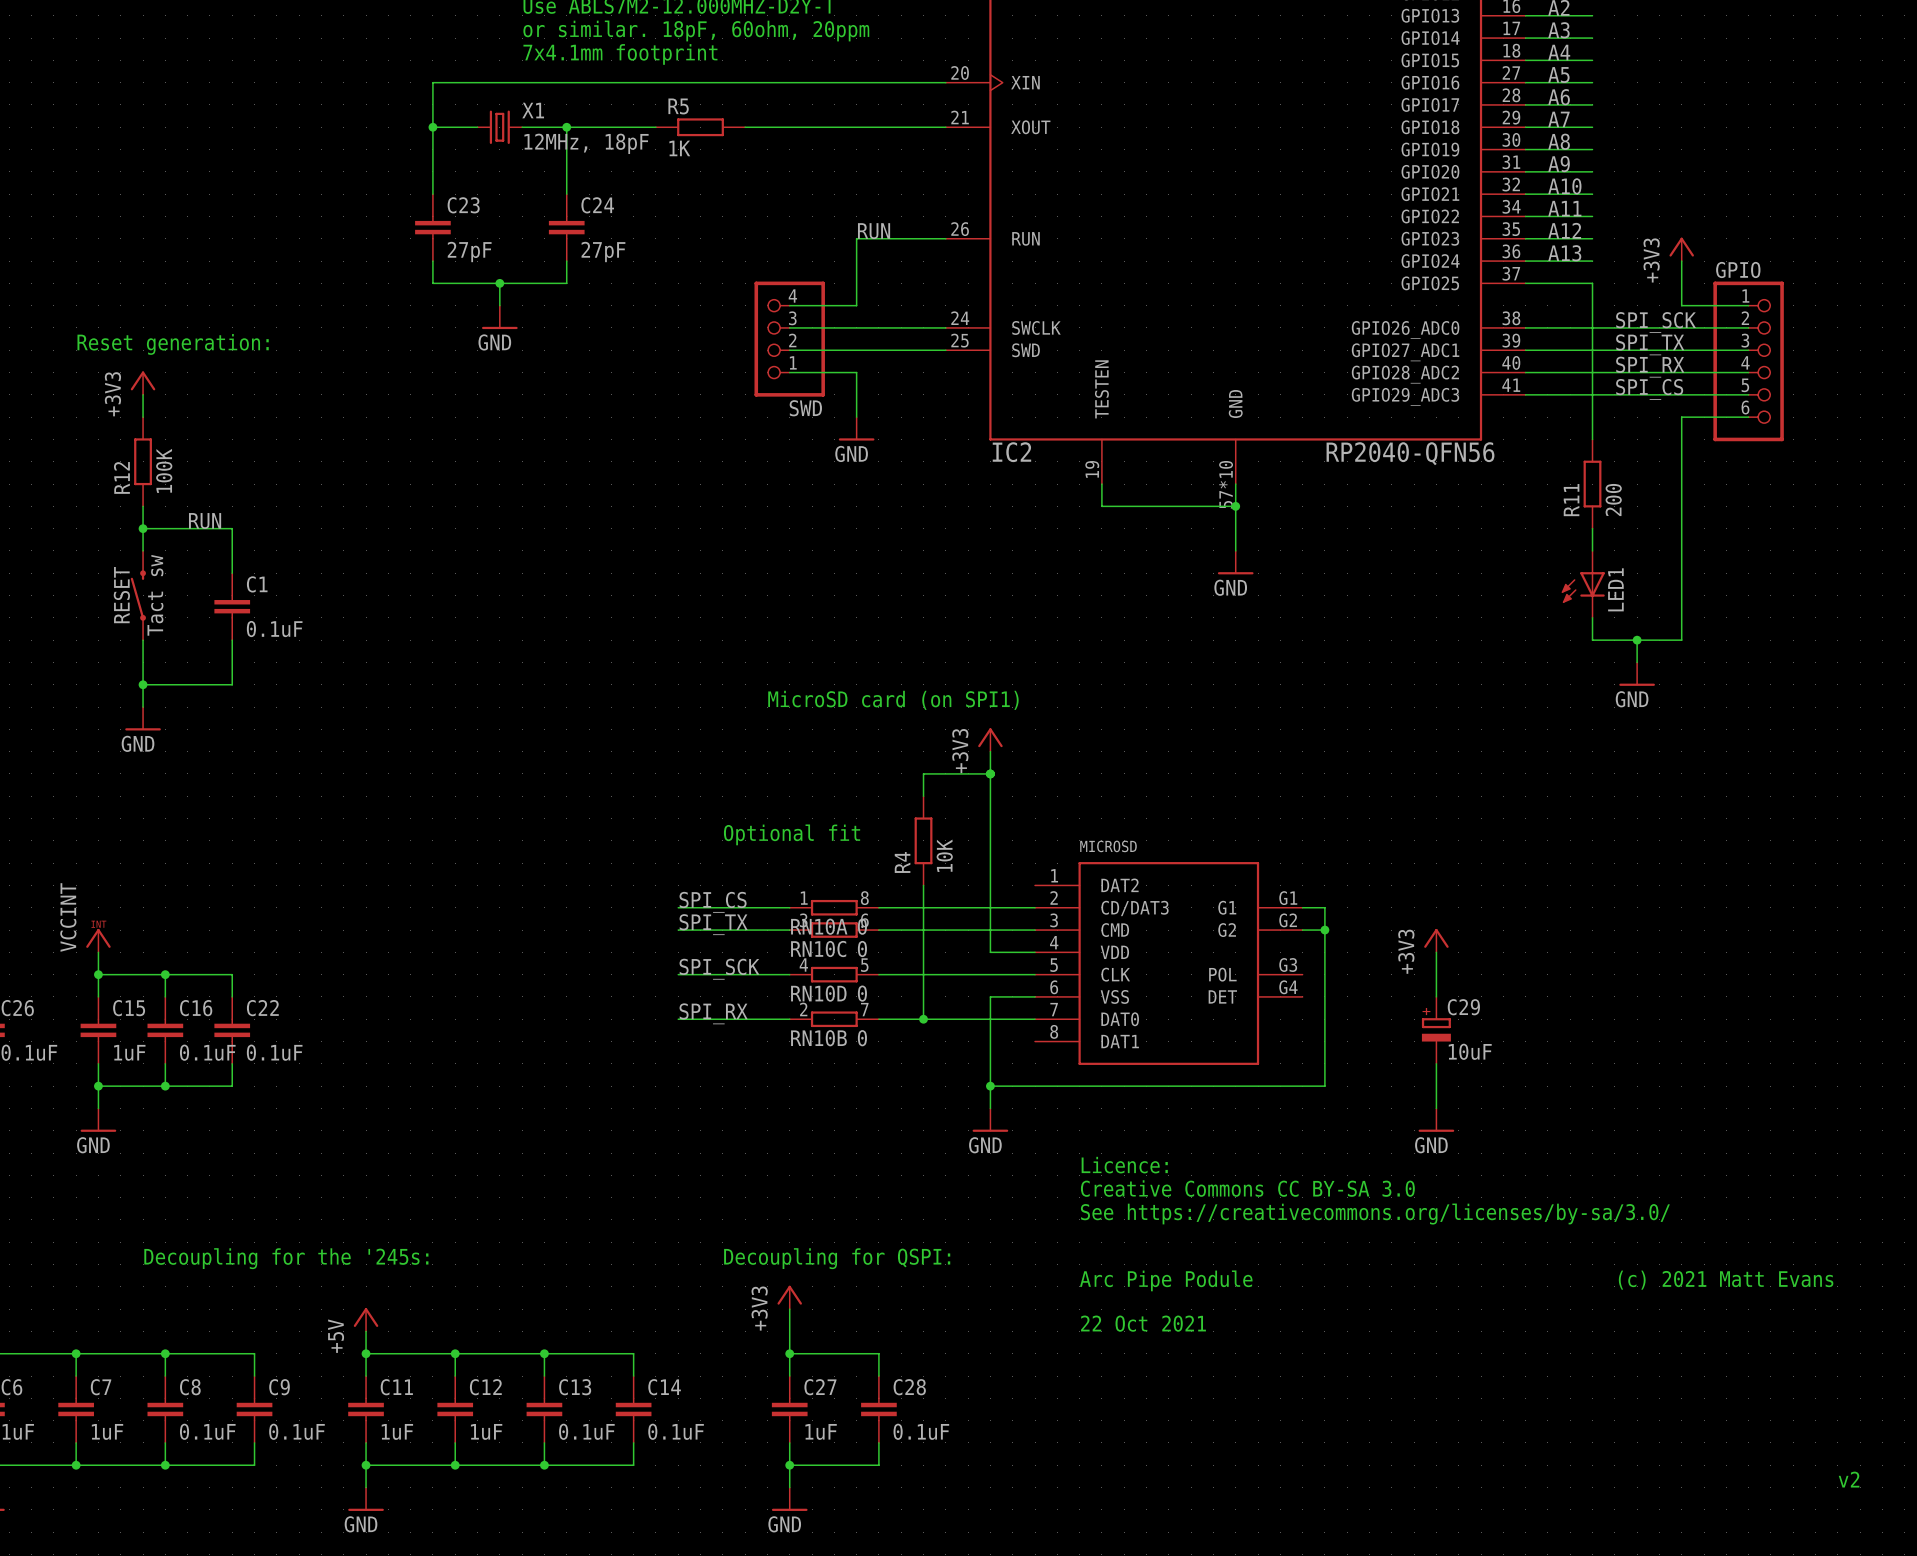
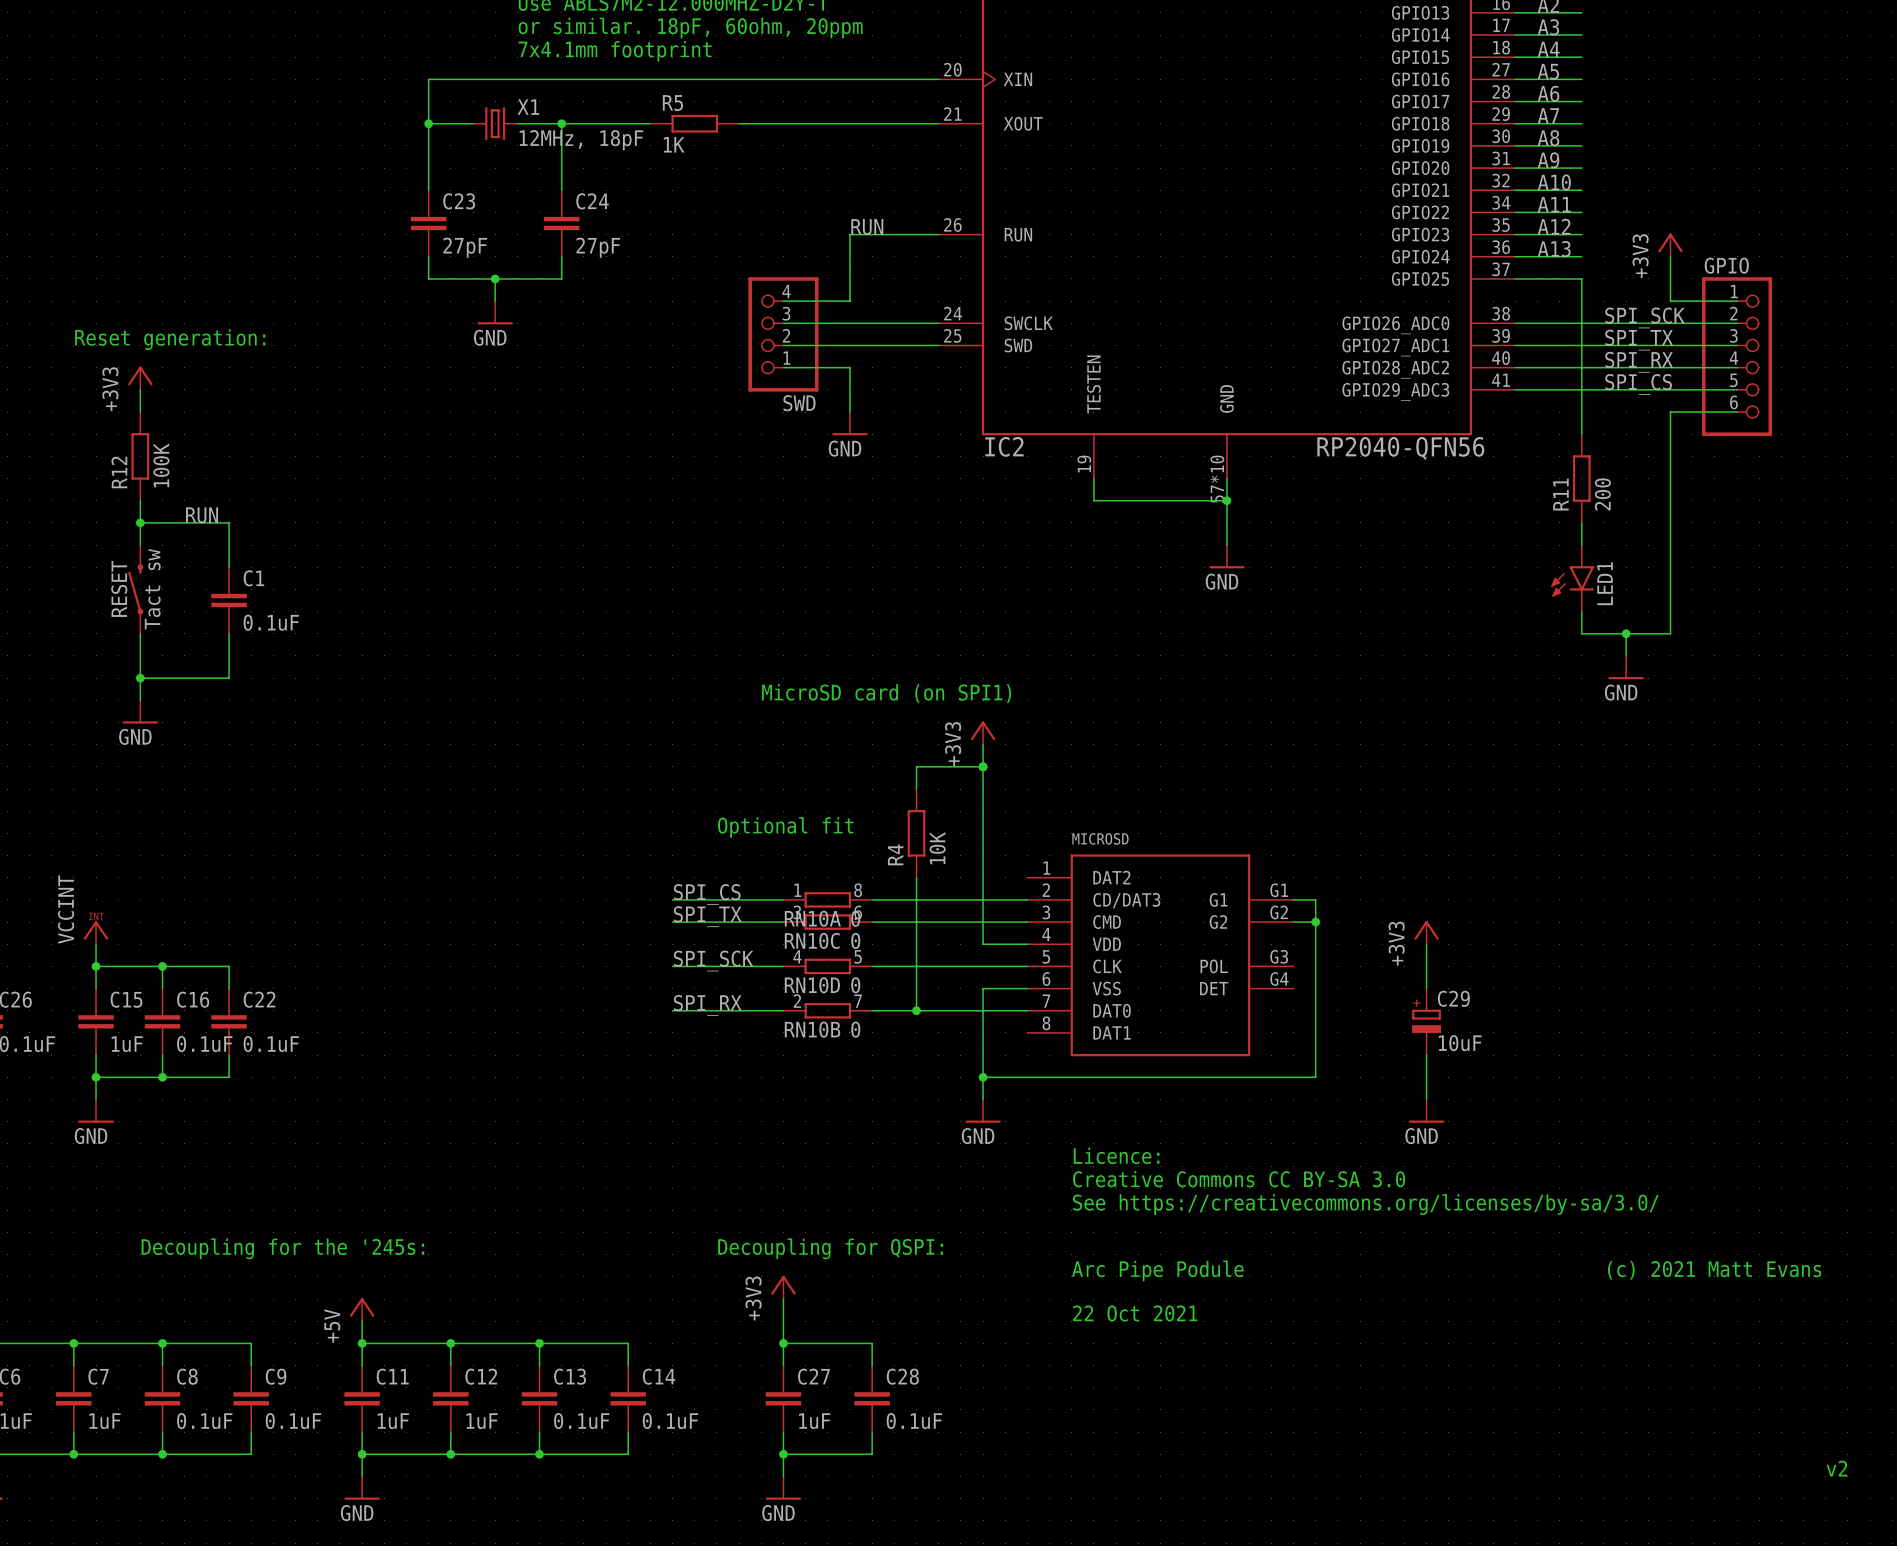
LED1 symbol: [1561, 550, 1605, 618] -> [1551, 545, 1595, 612]

